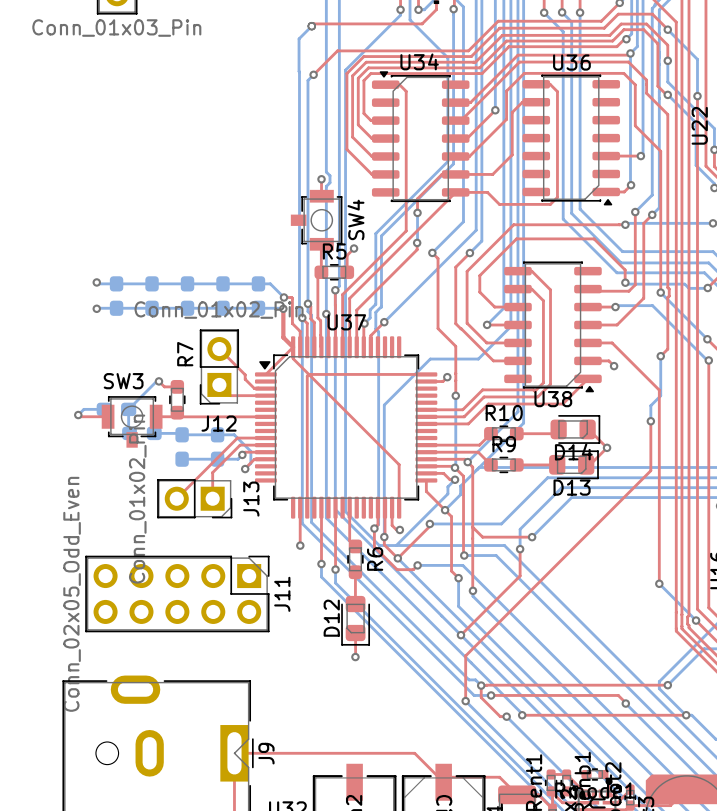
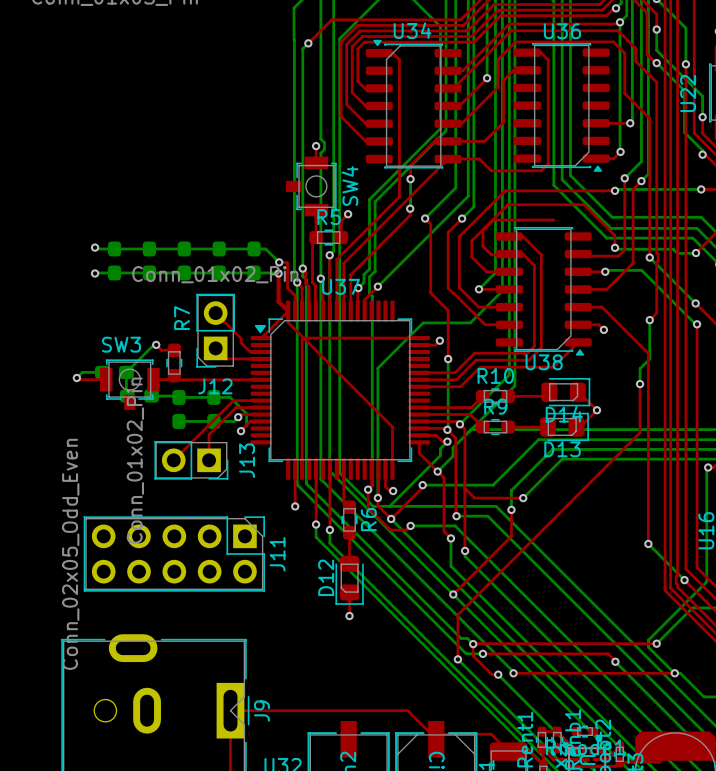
top track: none -> (553, 220) (493, 220) (482, 230) (482, 246) (491, 254) (509, 254)

